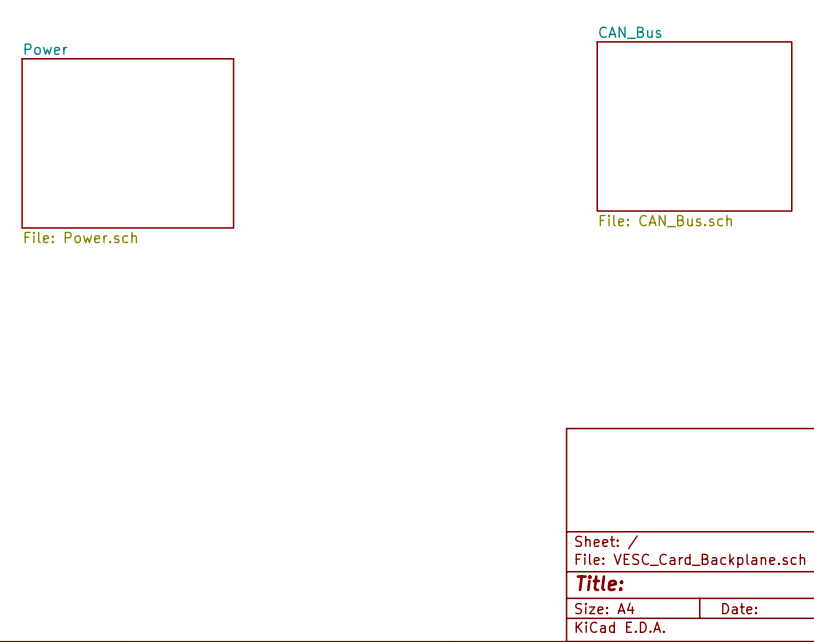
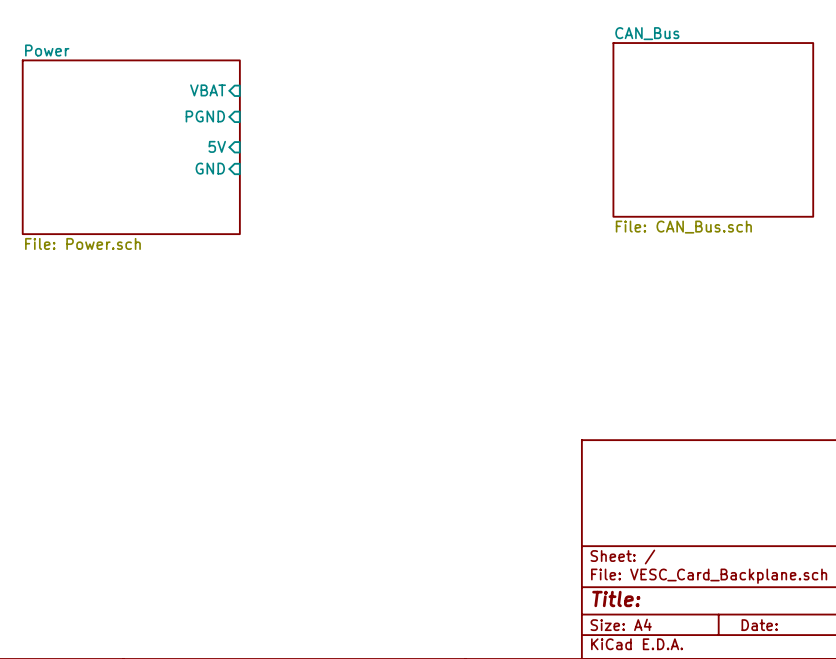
sheet pin: none -> VBAT (208, 90)
sheet pin: none -> PGND (205, 116)
sheet pin: none -> 5V (217, 146)
sheet pin: none -> GND (210, 168)

